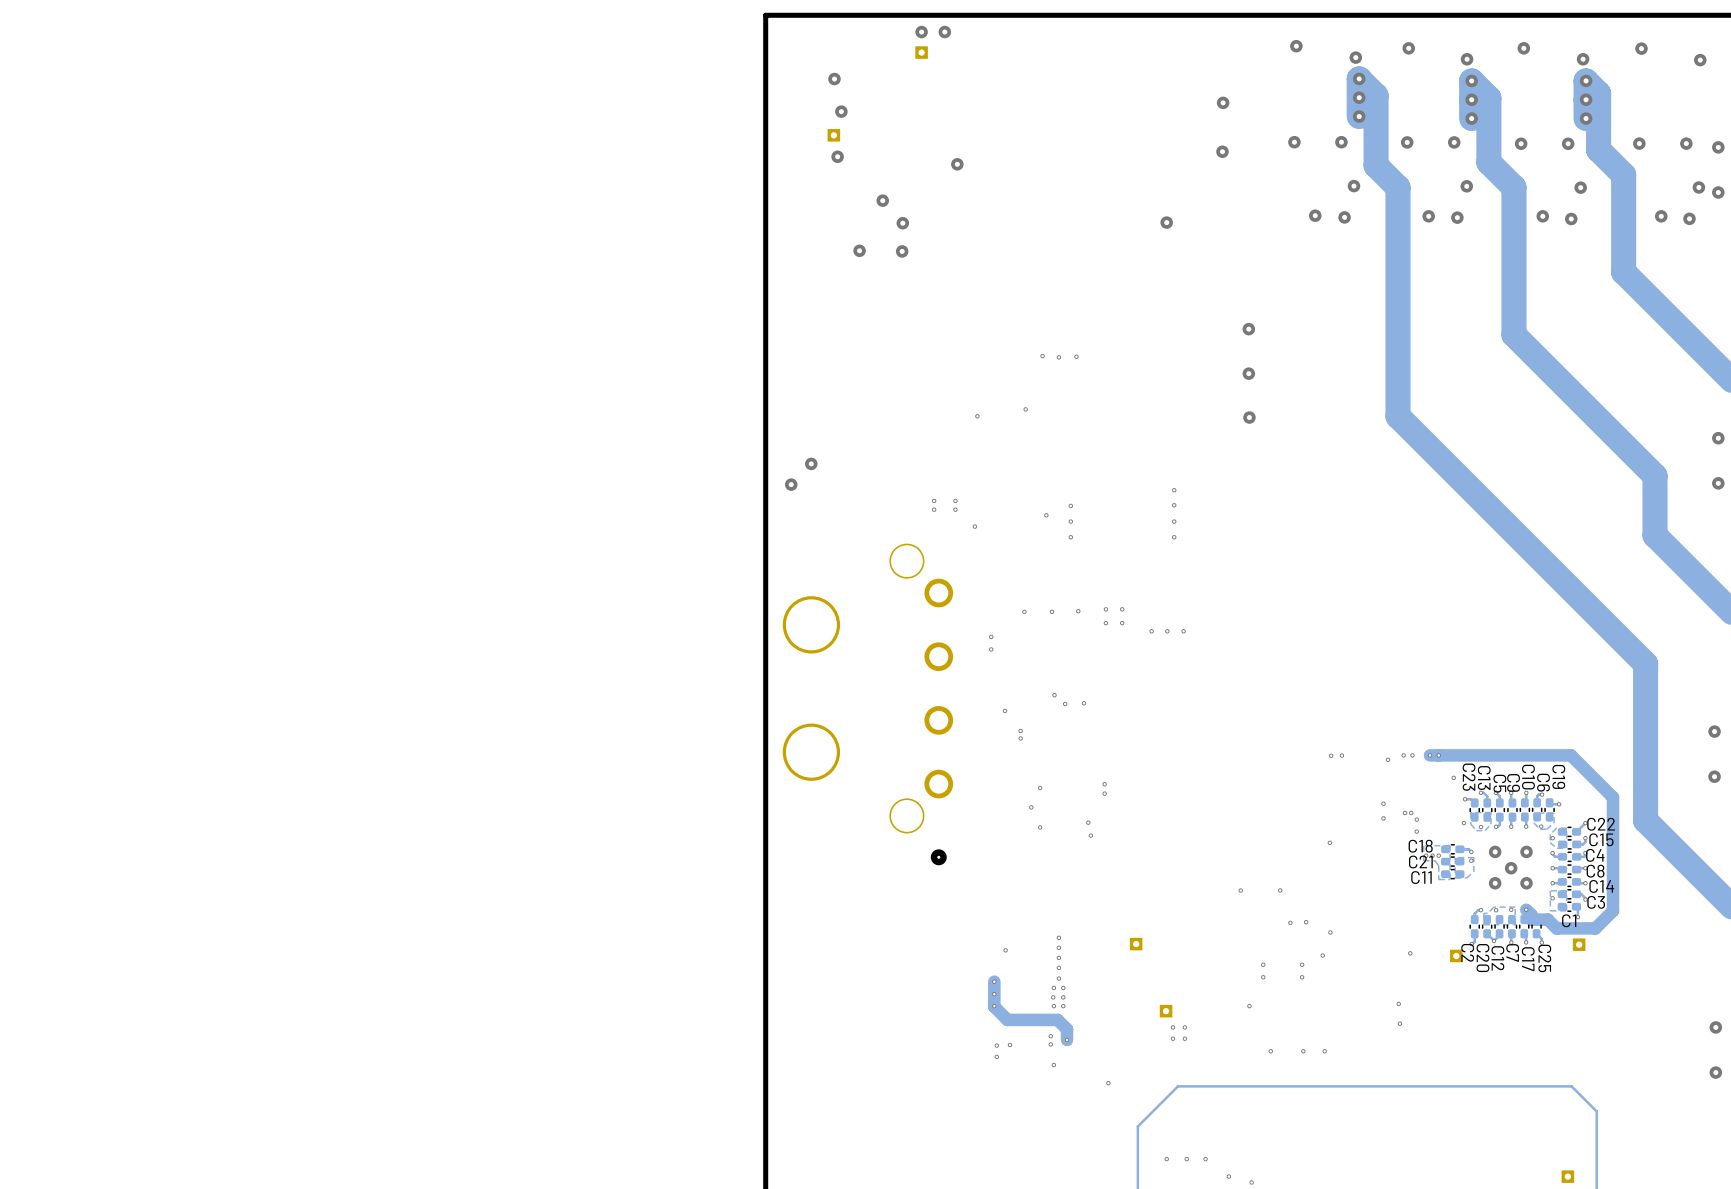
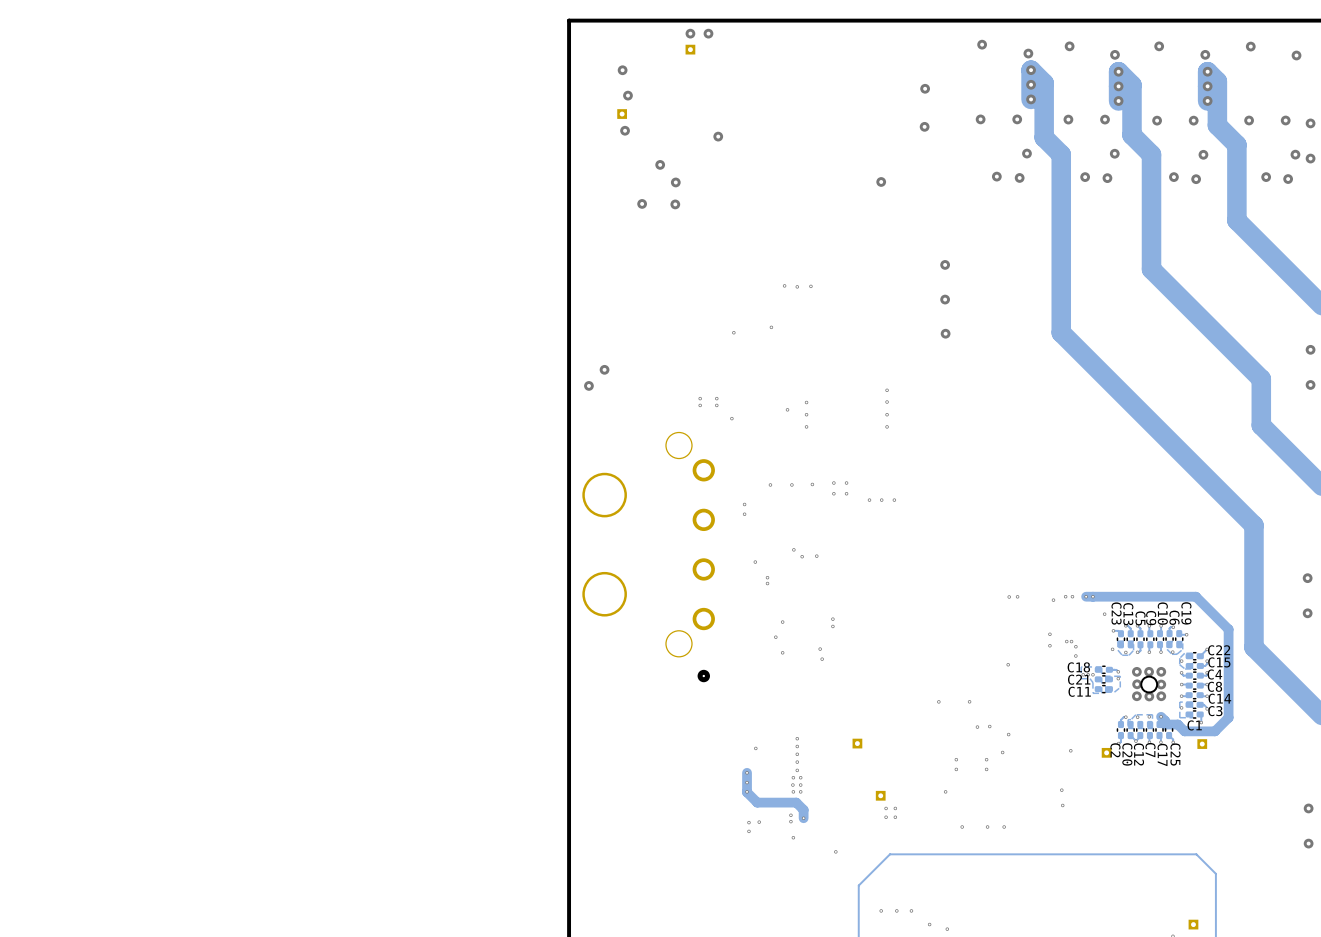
via: none -> (1149, 671)
round board edge: none -> [1140, 675, 1159, 694]
via: none -> (1137, 684)
via: (1511, 868) -> none
via: none -> (1161, 684)
via: none -> (1149, 696)

